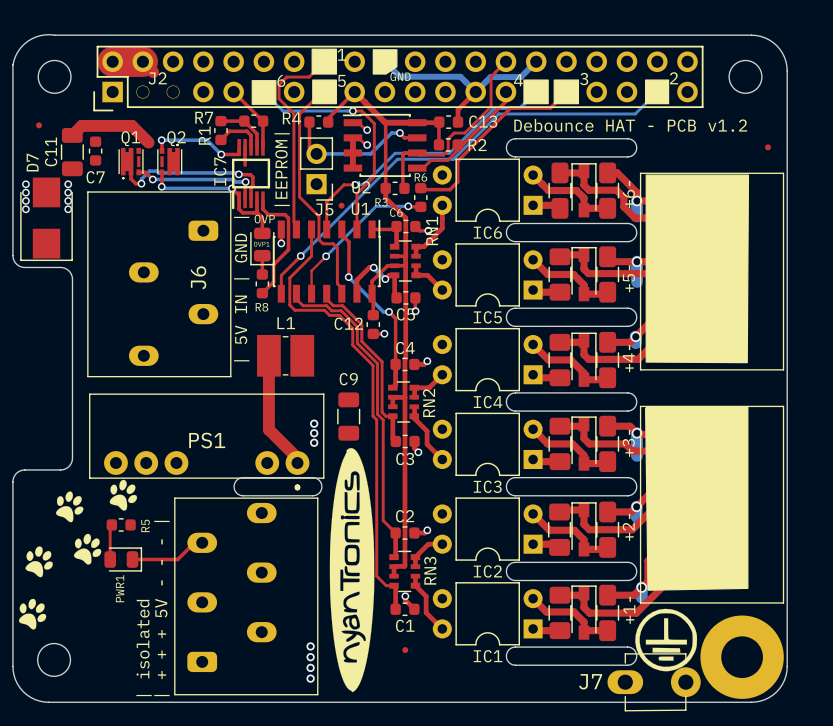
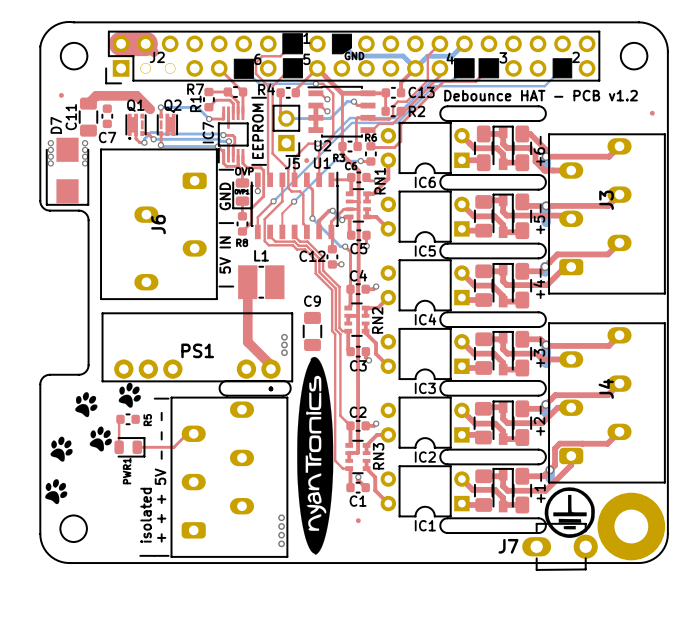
drawing: [645, 174, 750, 364] -> none
J6 name position: J6 (198, 277) -> J6 (158, 224)
drawing: [645, 406, 749, 591] -> none

